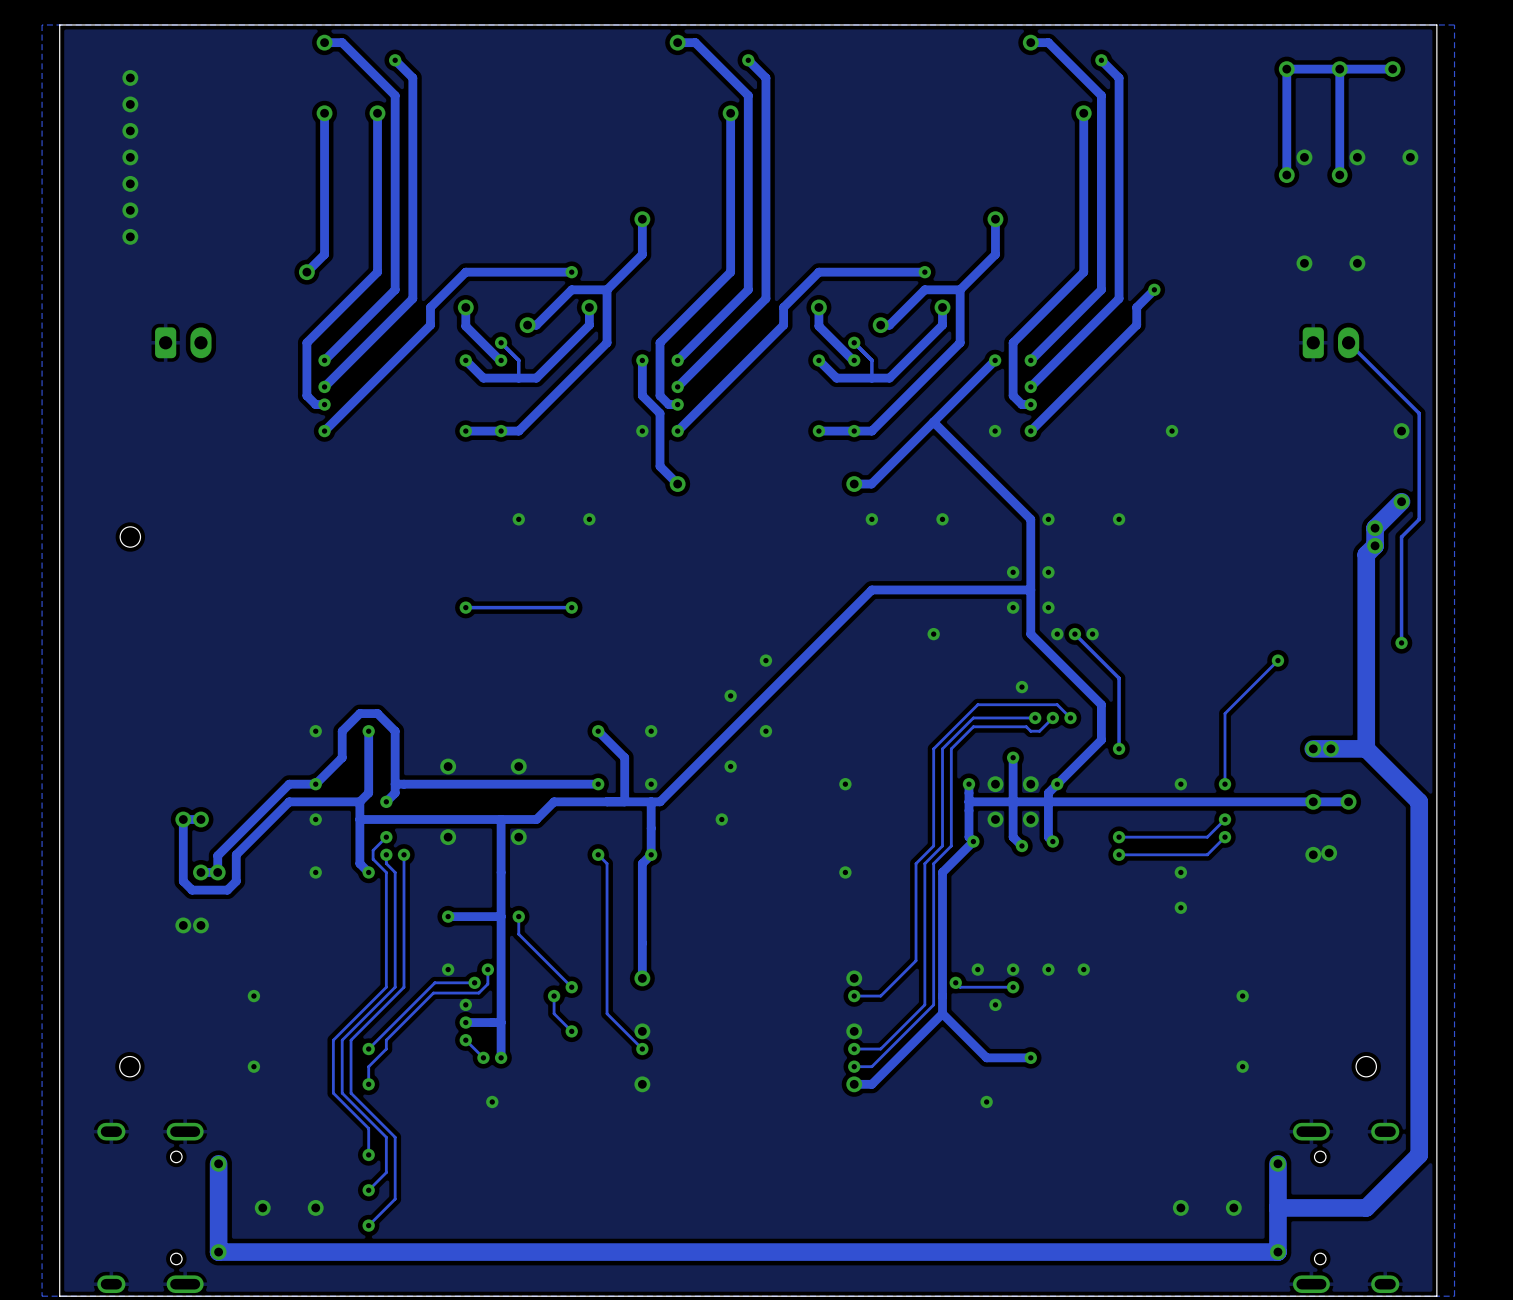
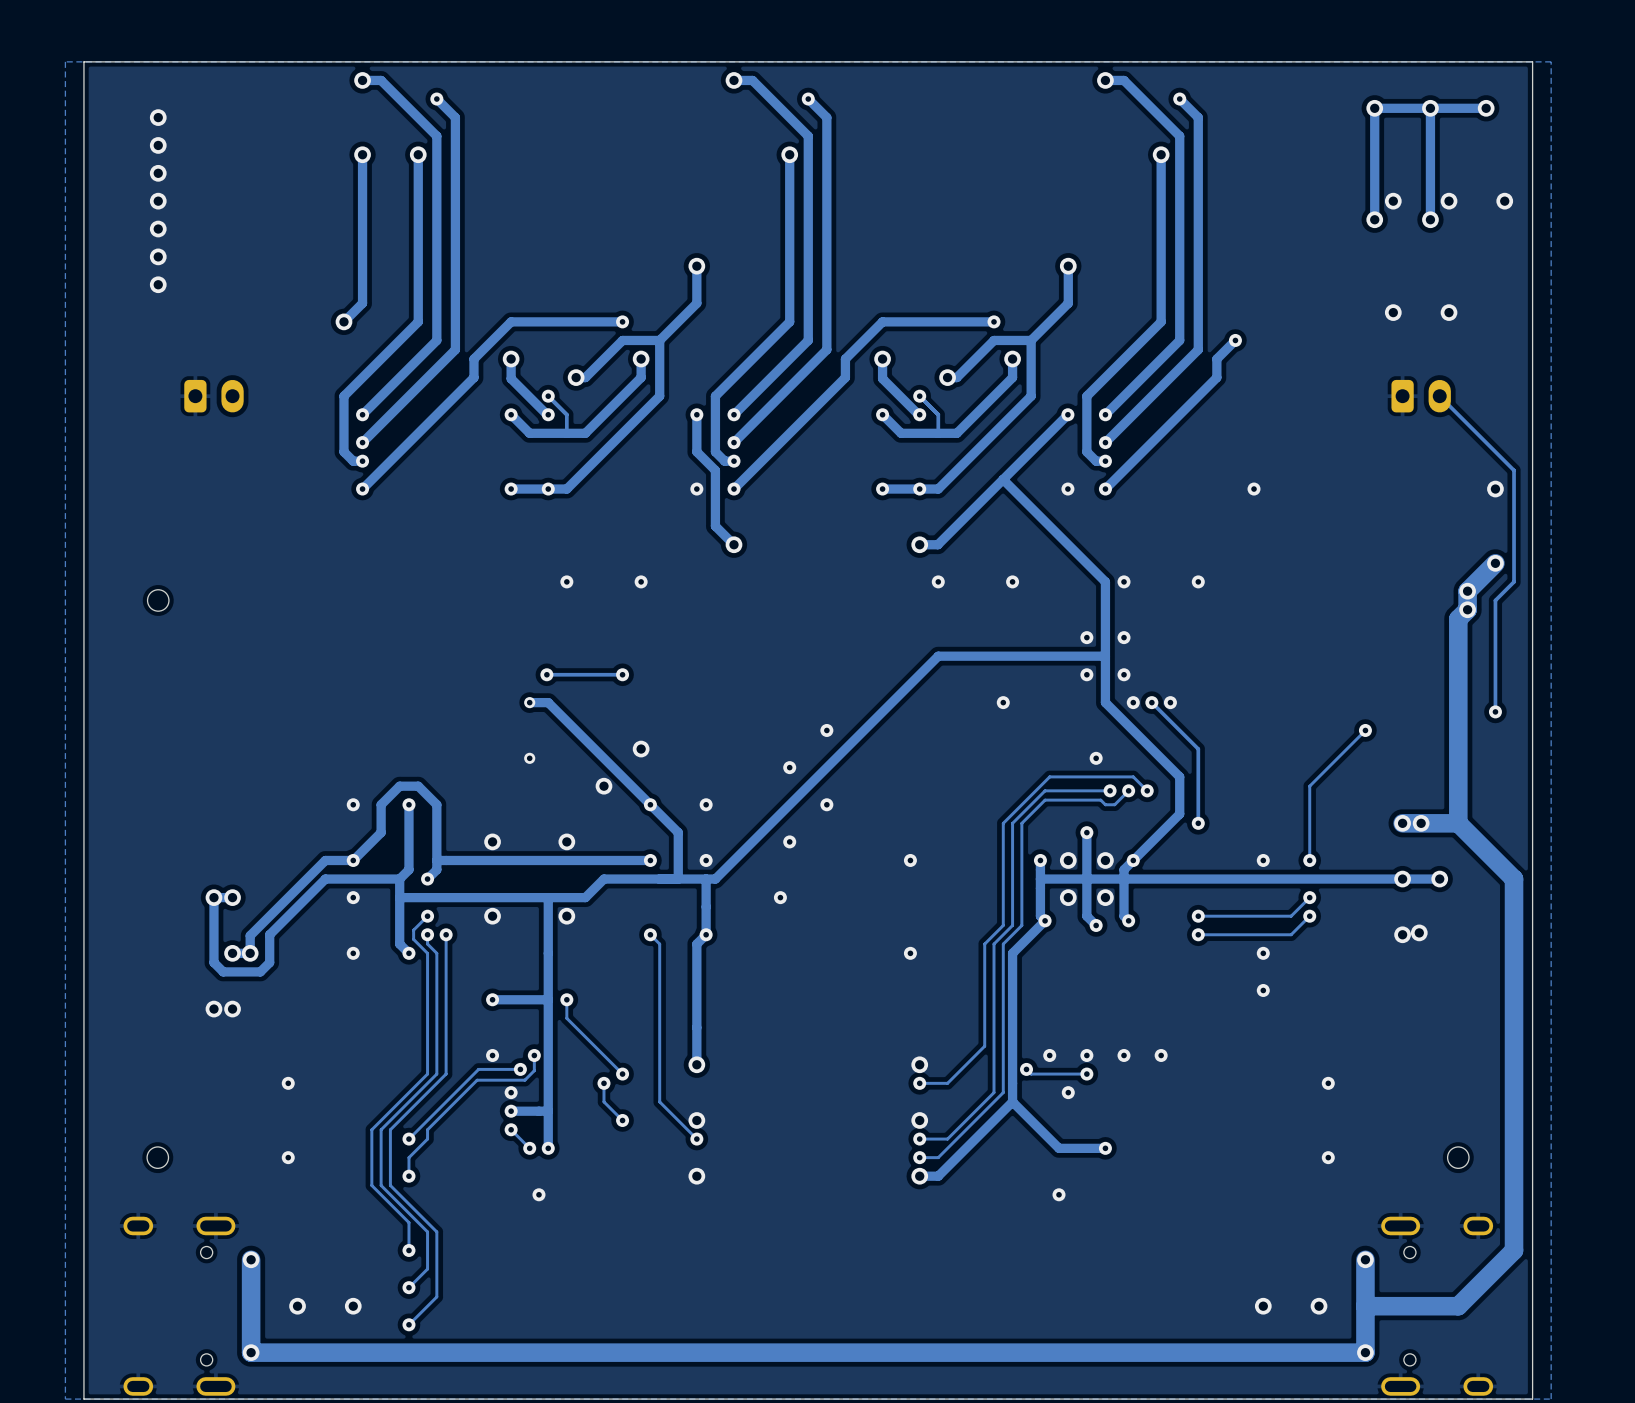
via position: (465, 607) -> (546, 674)
track: (499, 607) (465, 607) -> none
track: none -> (529, 702) (548, 702) (650, 804)
via: none -> (529, 702)
via: none -> (641, 749)
via: none -> (529, 758)
via: none -> (603, 786)

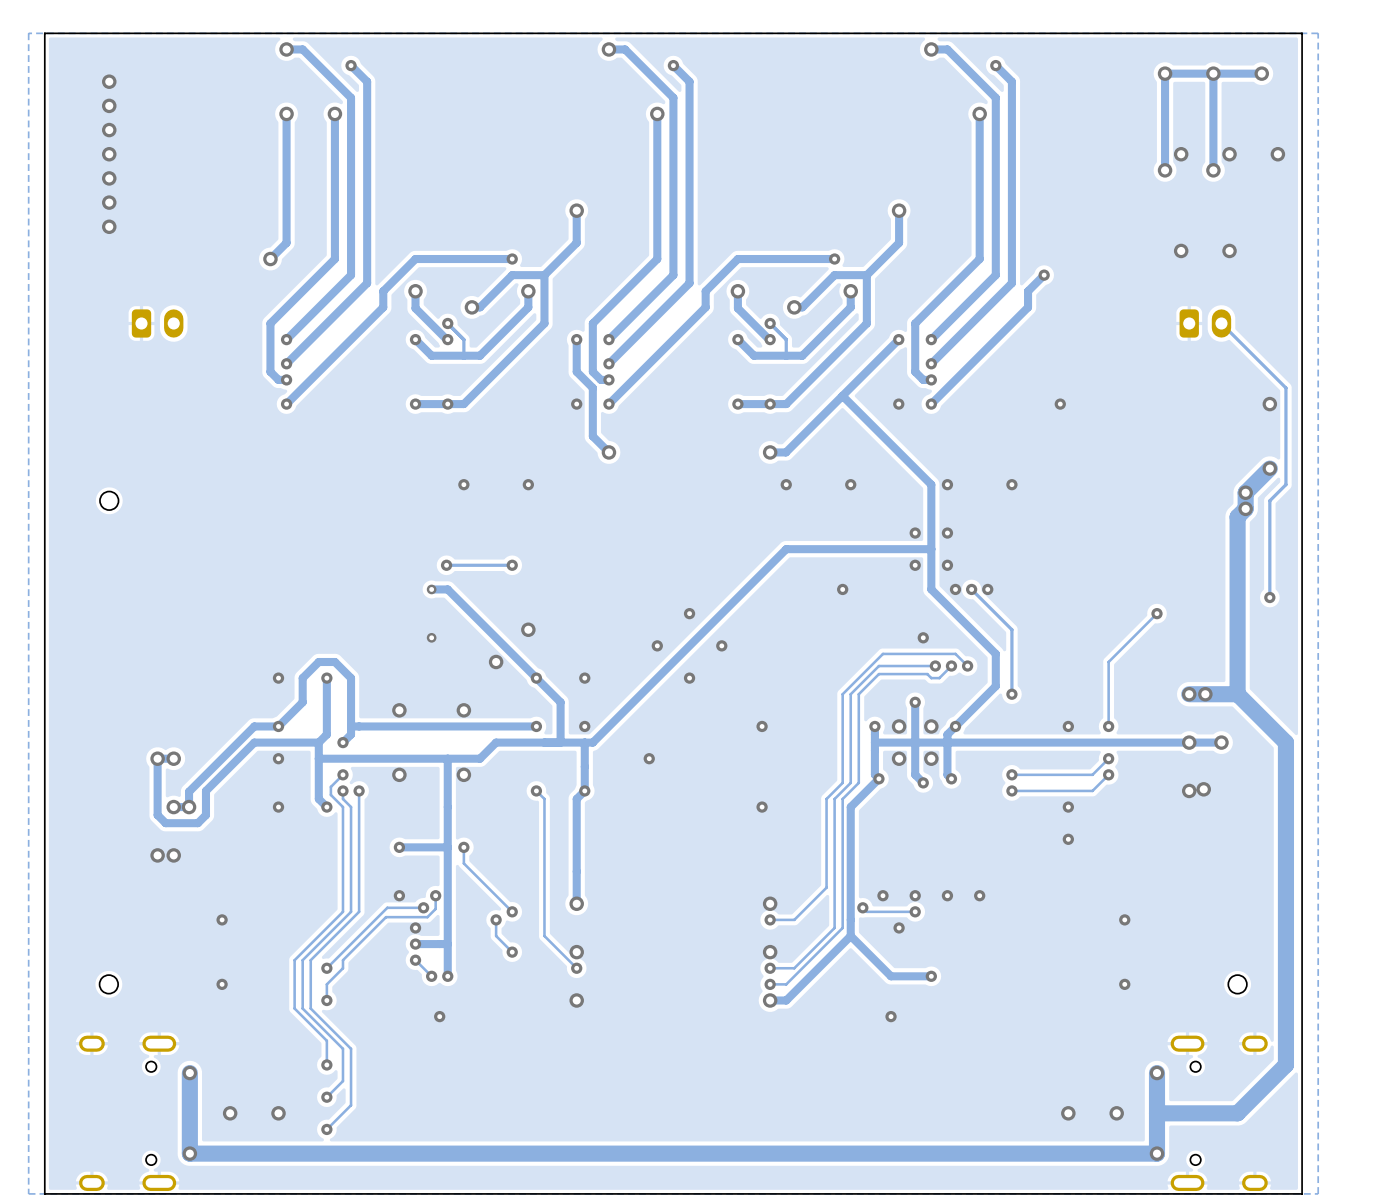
via position: (789, 841) -> (721, 645)

